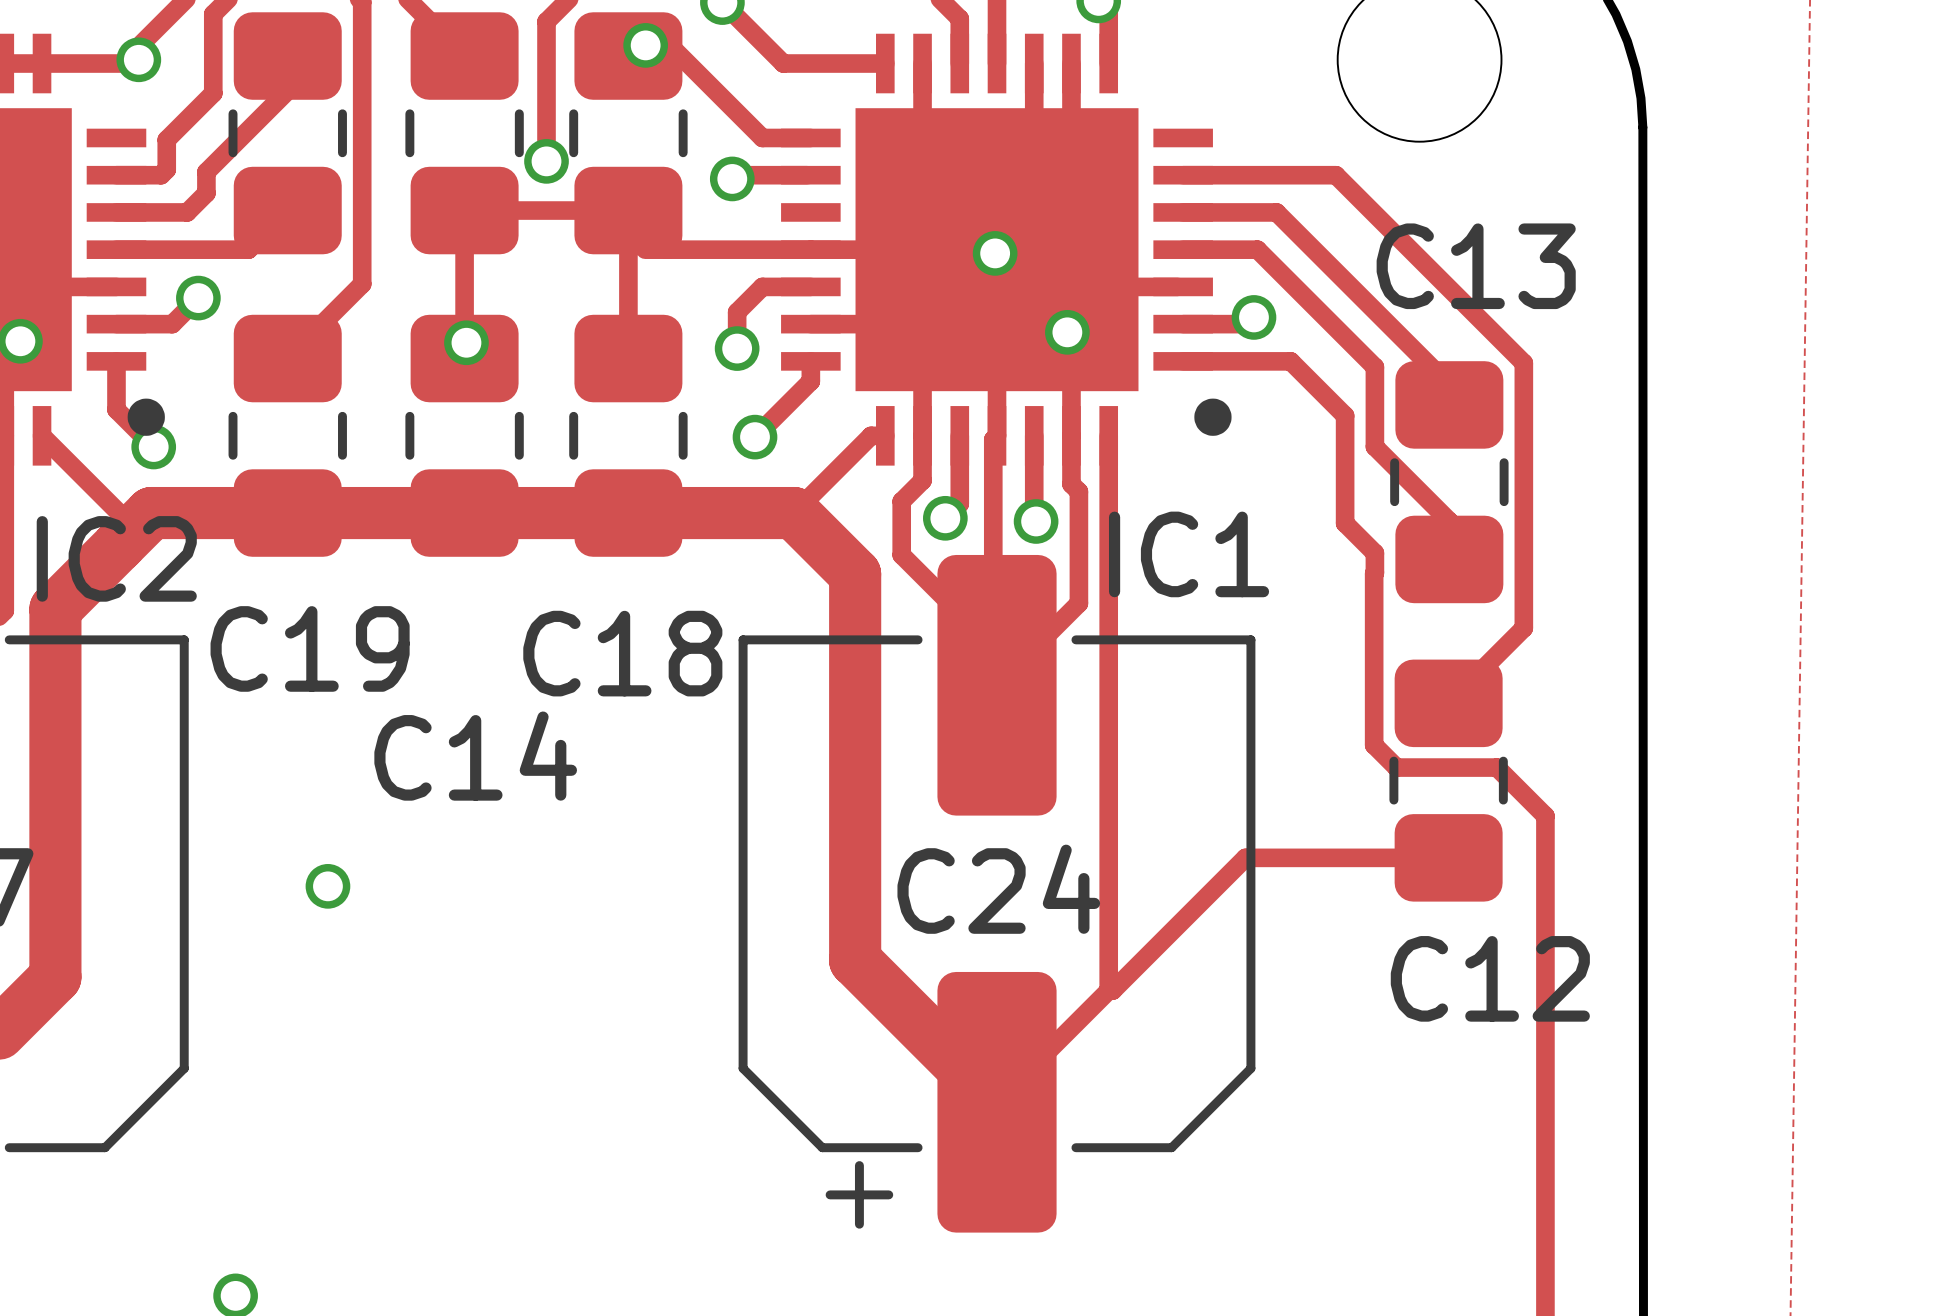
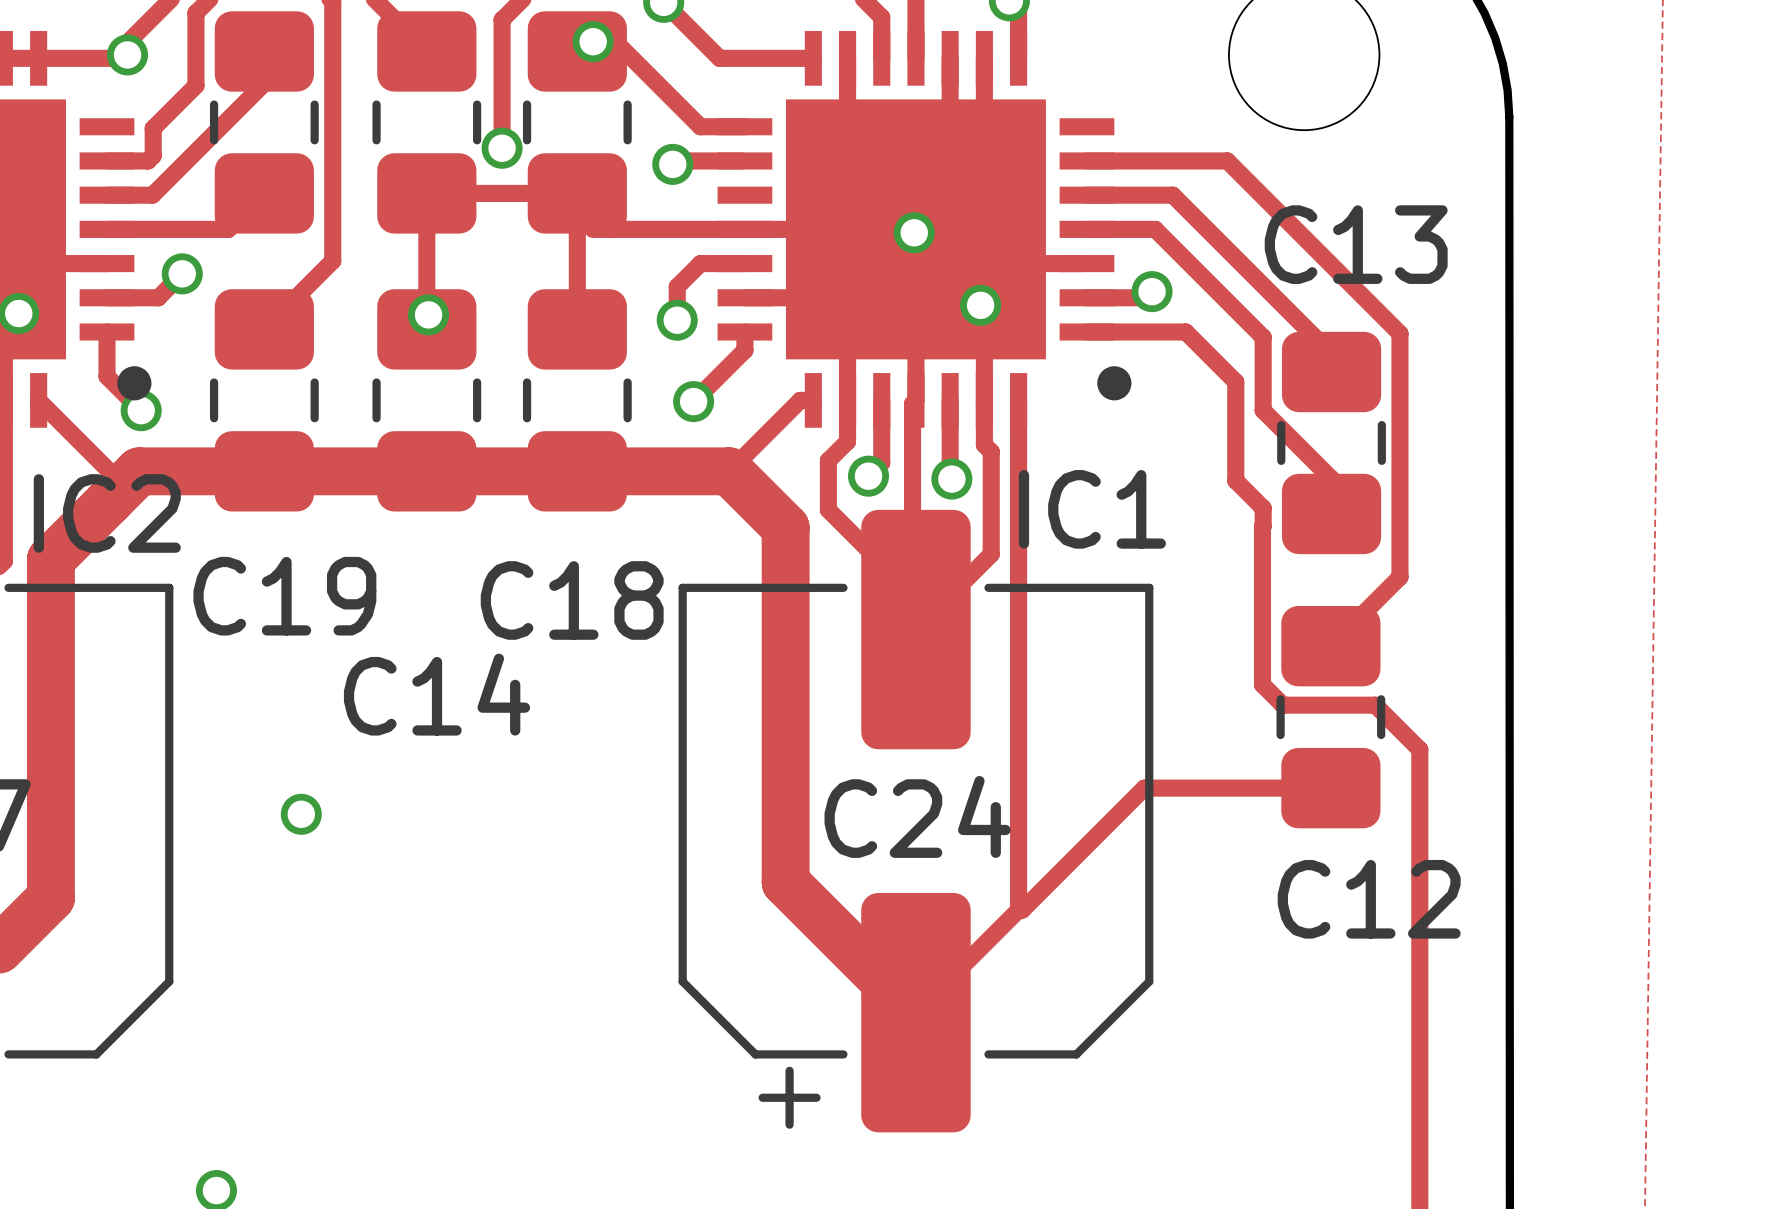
track: (206, 172) (206, 193) (187, 212) (166, 212) -> (189, 158) (152, 195)

